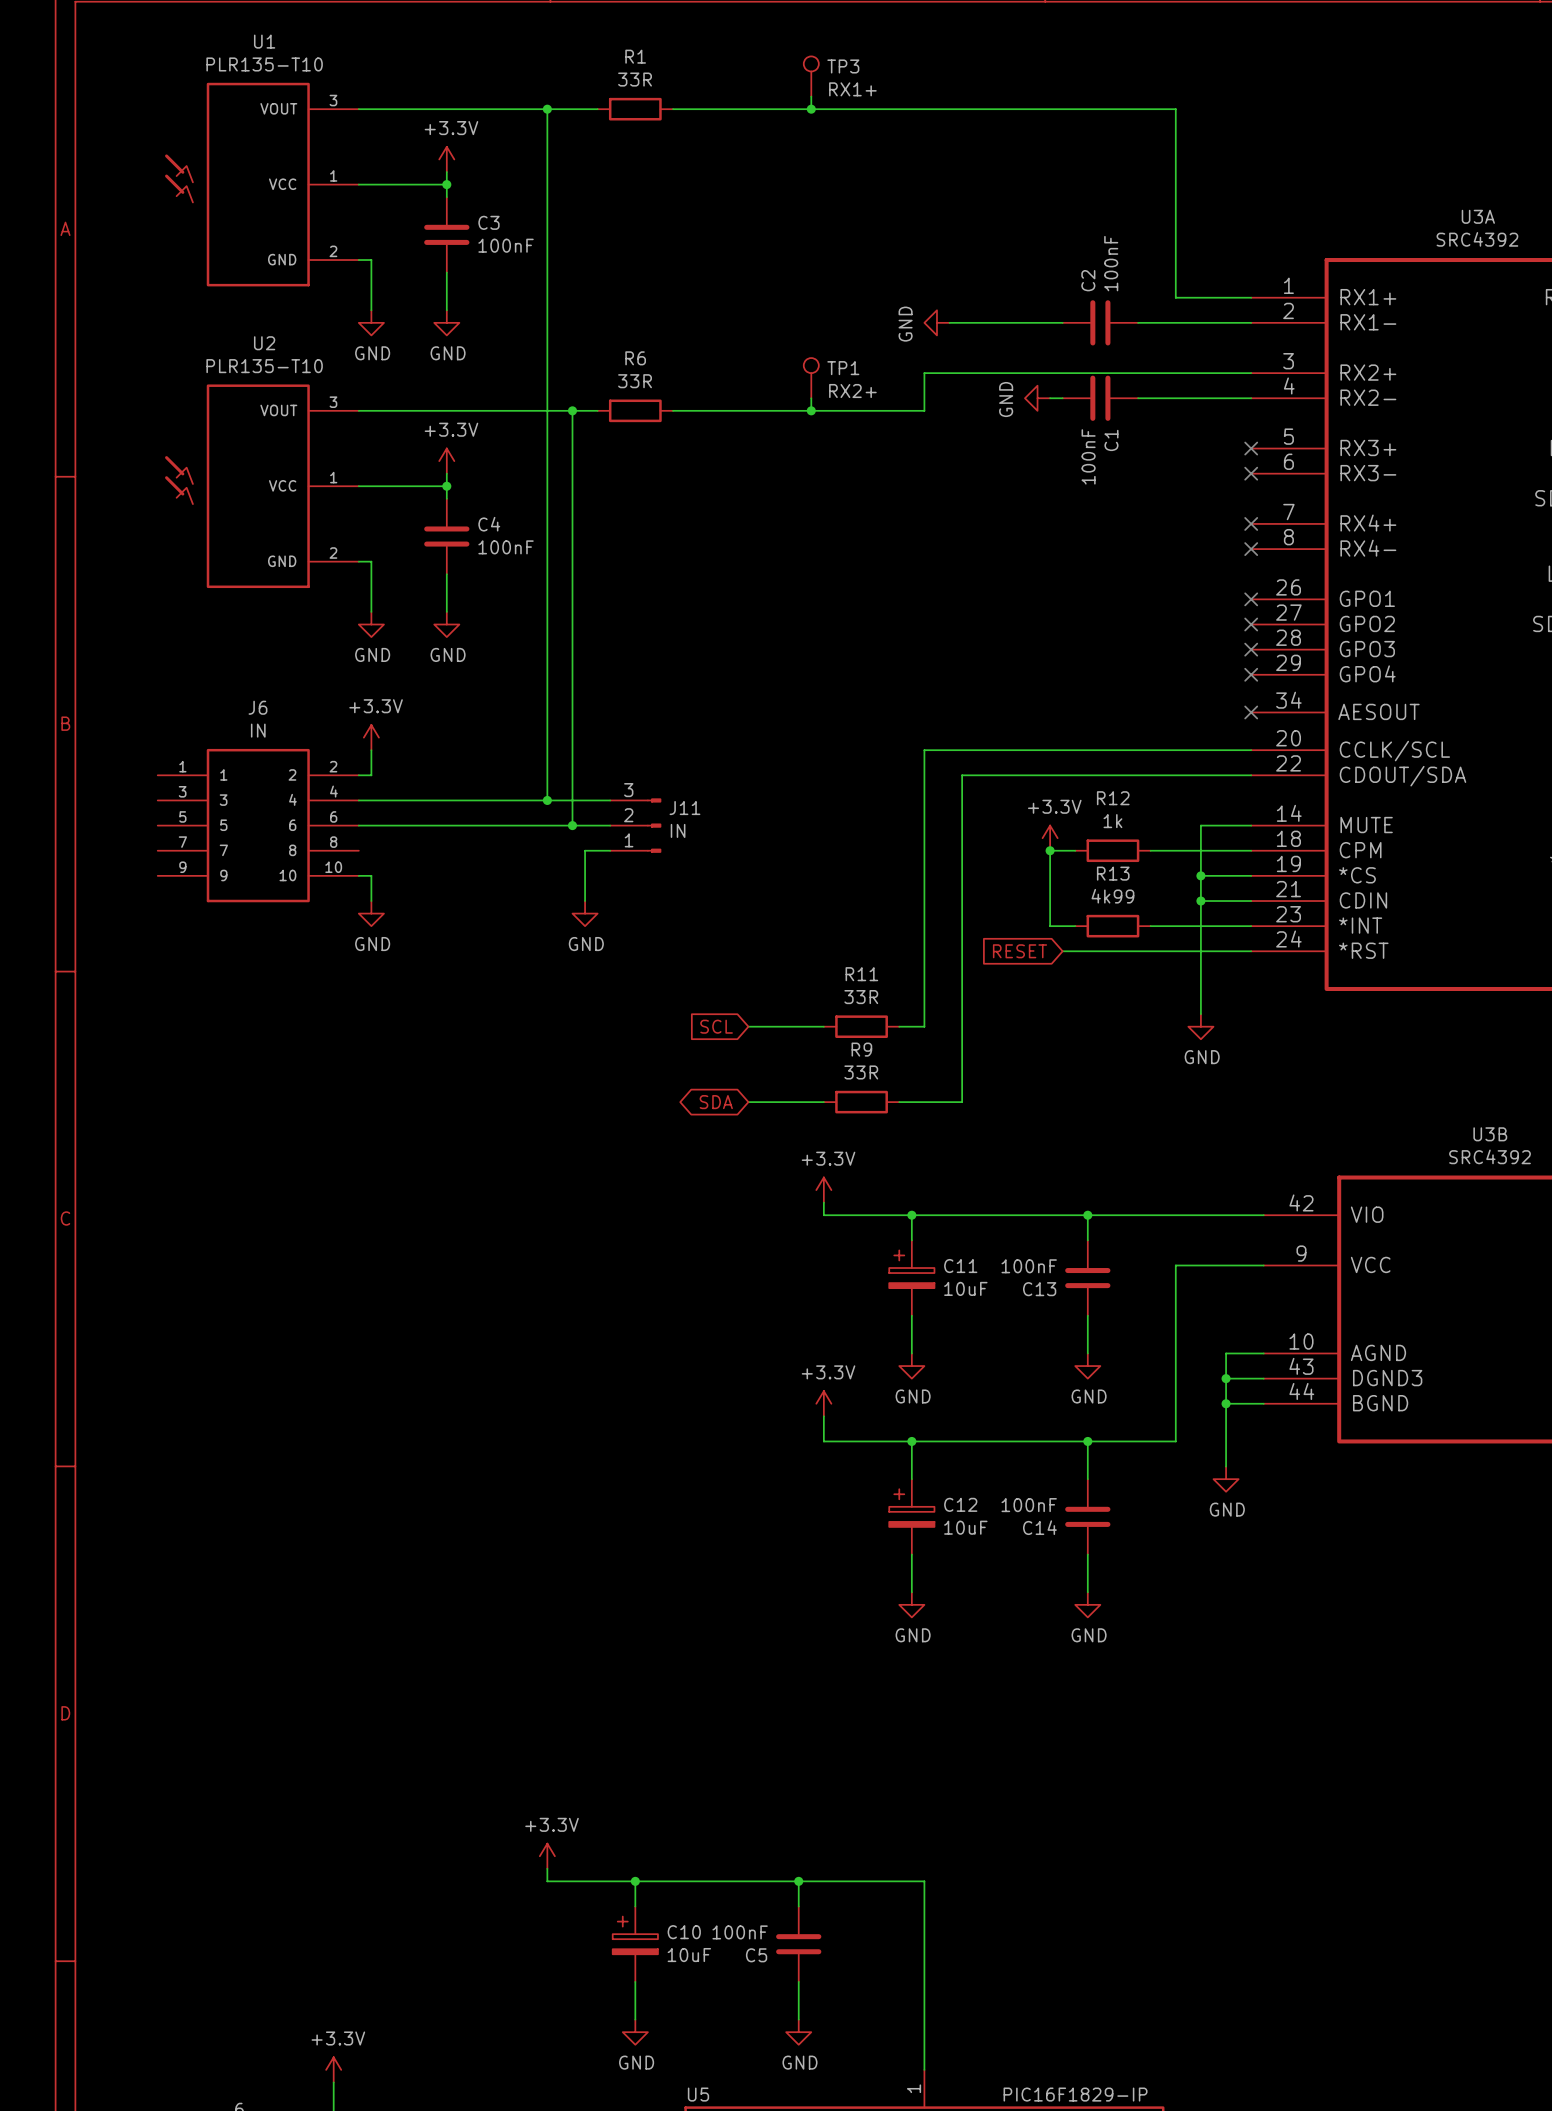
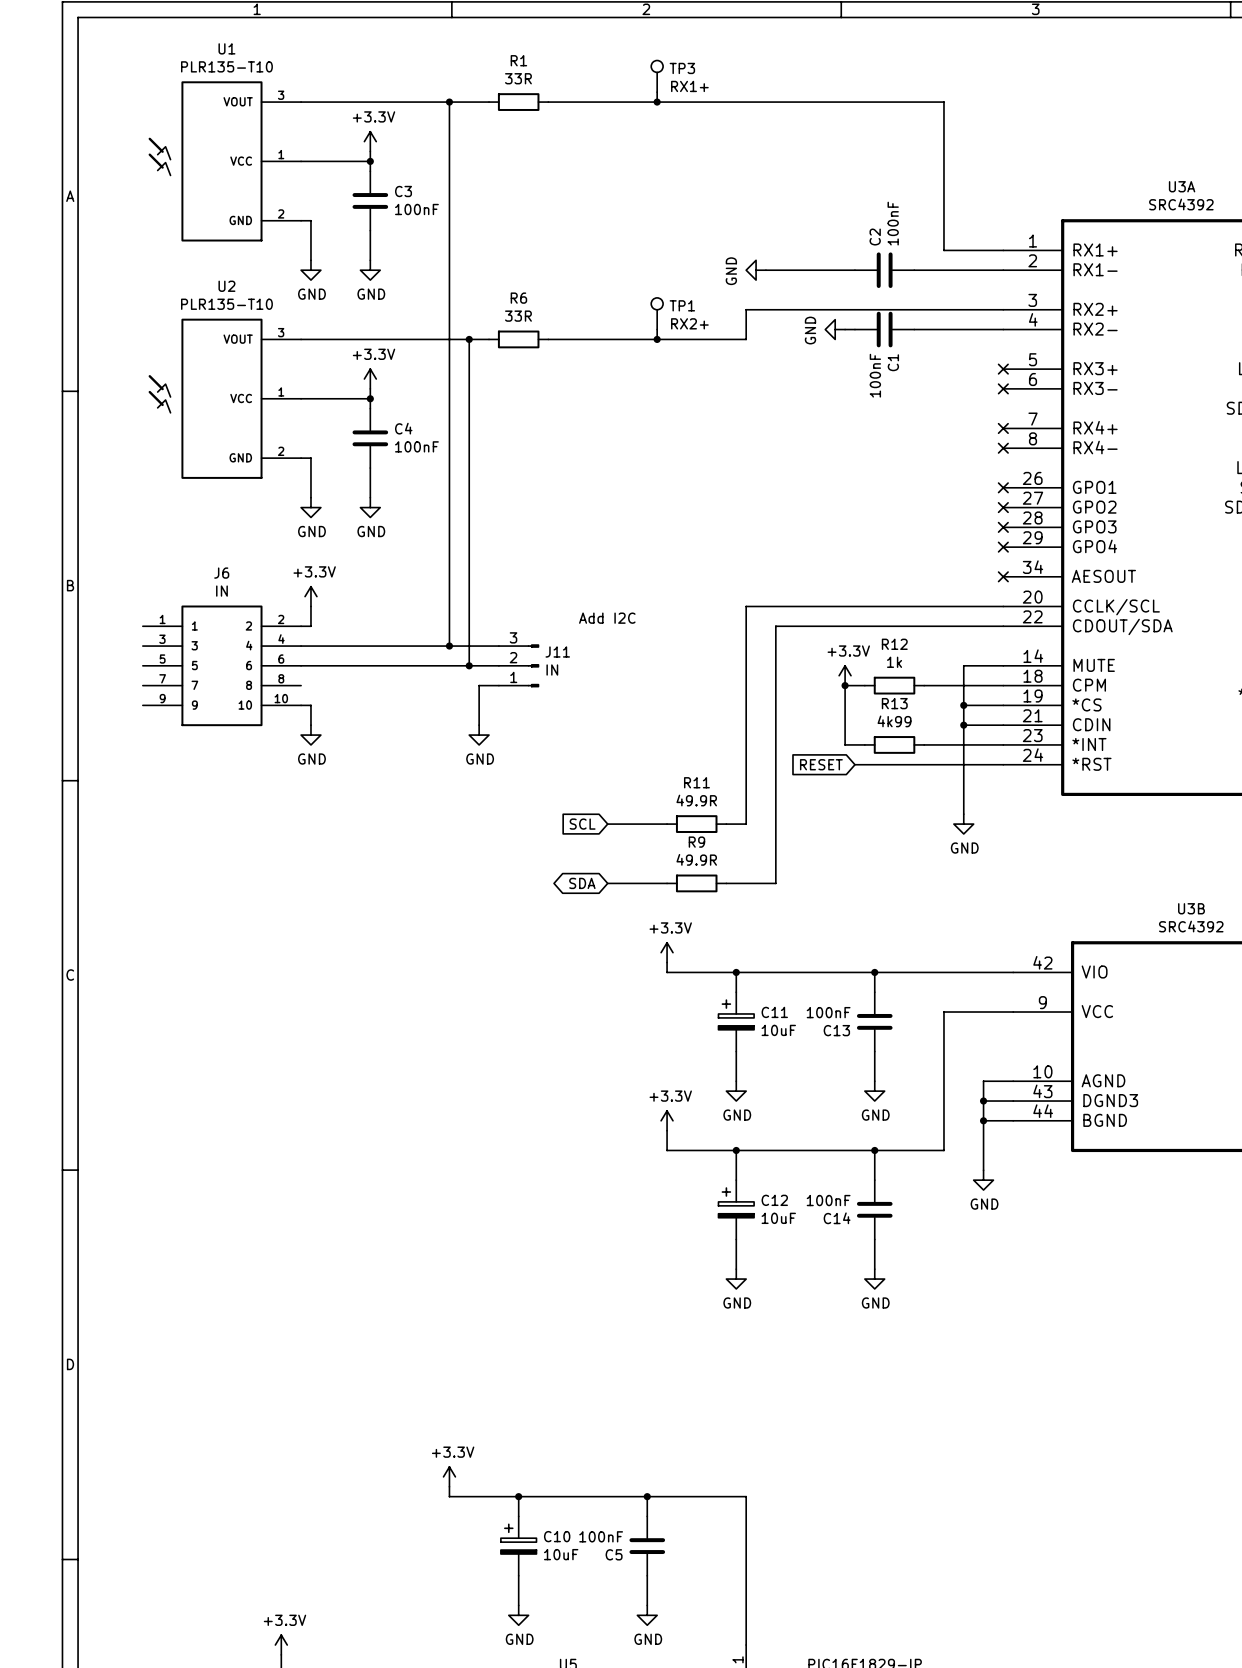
text: none -> Add I2C (607, 618)
R11 value: 33R (861, 997) -> 49.9R (696, 800)
R9 value: 33R (861, 1072) -> 49.9R (696, 859)

